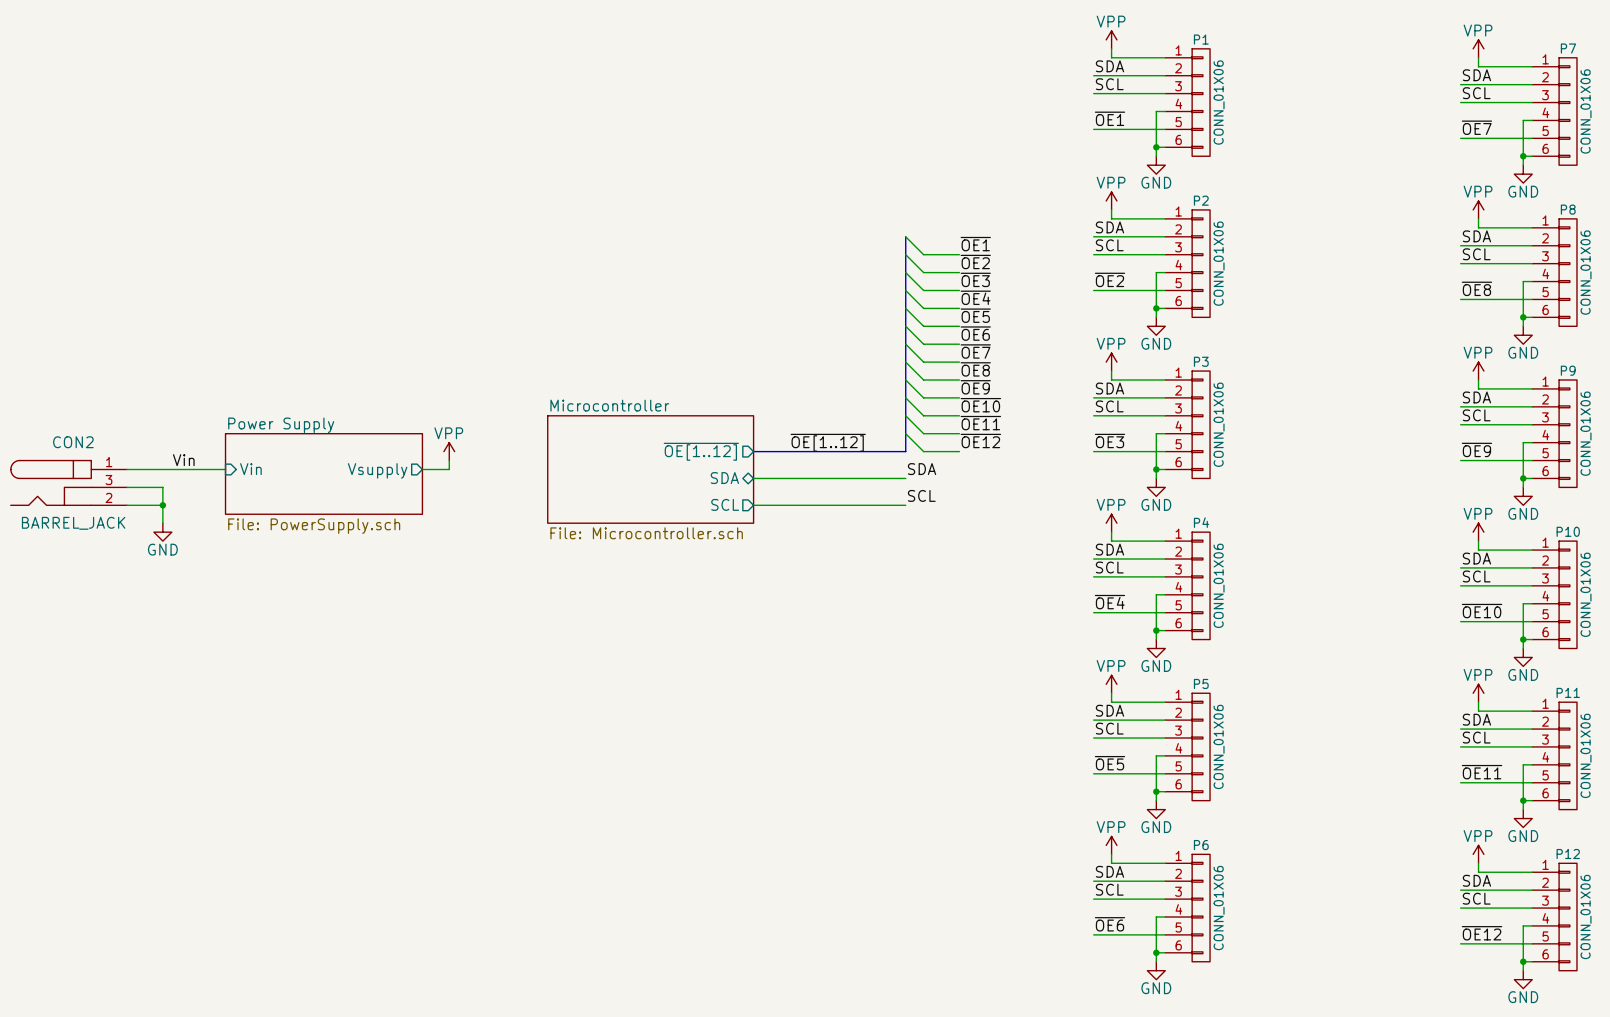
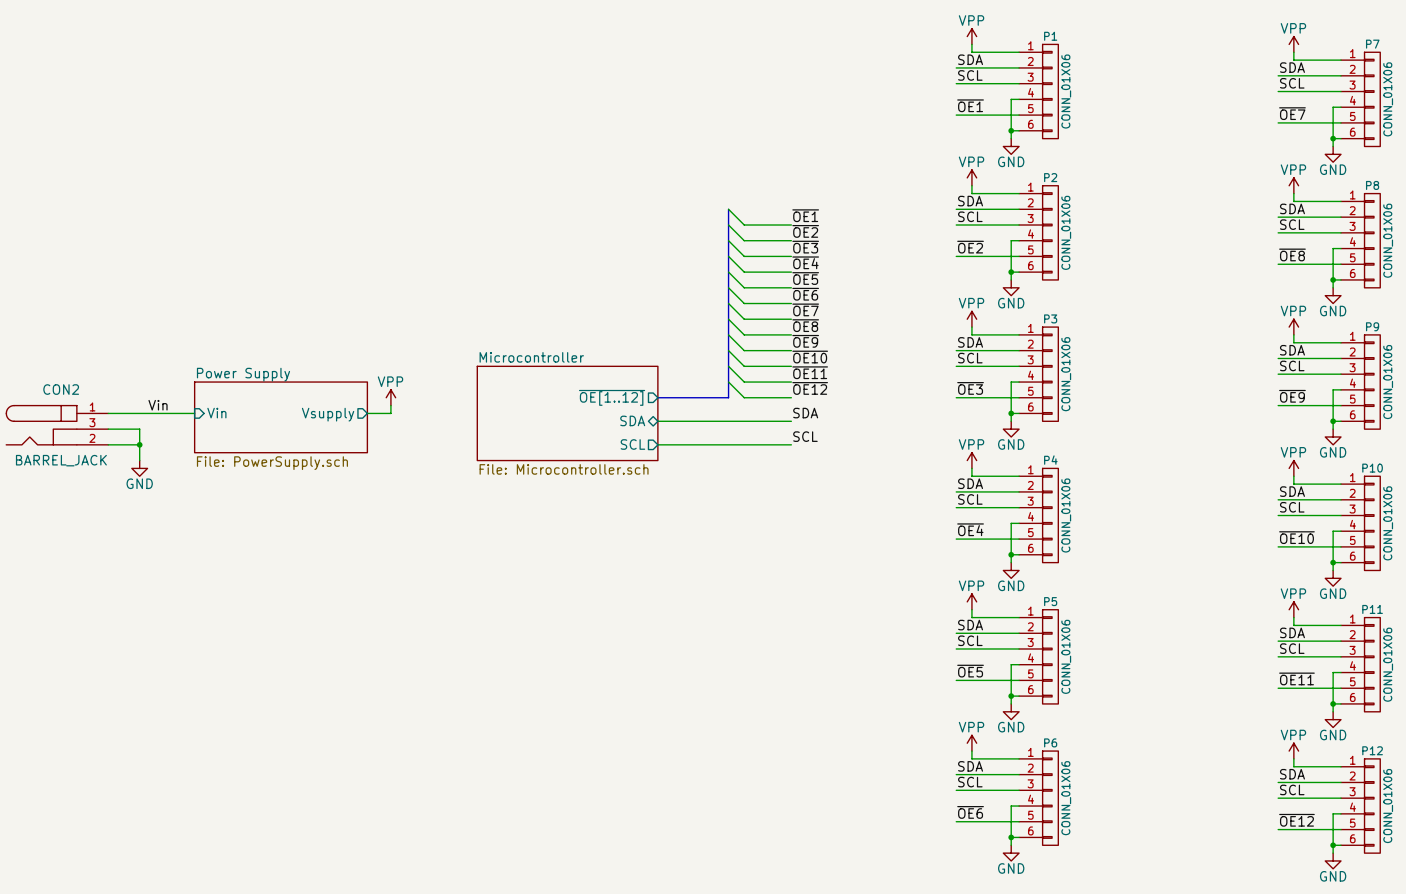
wire: (905, 236) (923, 254) (959, 254) -> none
bus: (905, 236) (905, 451) (834, 451) -> (728, 209) (728, 397)
label position: ~{OE1} (975, 244) -> ~{OE1} (805, 215)
wire: (905, 254) (923, 272) (959, 272) -> (791, 225) (744, 225) (728, 209)
label position: ~{OE2} (975, 261) -> ~{OE2} (805, 231)
wire: (905, 272) (923, 290) (959, 290) -> (791, 240) (744, 240) (728, 225)
label position: ~{OE3} (975, 279) -> ~{OE3} (805, 247)
wire: (905, 290) (923, 308) (959, 308) -> (791, 256) (744, 256) (728, 240)
label position: ~{OE4} (975, 297) -> ~{OE4} (805, 262)
wire: (905, 308) (923, 326) (959, 326) -> (791, 272) (744, 272) (728, 256)
label position: ~{OE5} (975, 315) -> ~{OE5} (805, 278)
wire: (905, 326) (923, 344) (959, 344) -> (791, 287) (744, 287) (728, 272)
label position: ~{OE6} (975, 333) -> ~{OE6} (805, 294)
wire: (905, 344) (923, 362) (959, 362) -> (791, 303) (744, 303) (728, 287)
label position: ~{OE7} (975, 351) -> ~{OE7} (805, 309)
wire: (905, 362) (923, 380) (959, 380) -> (791, 319) (744, 319) (728, 303)
label position: ~{OE8} (975, 369) -> ~{OE8} (805, 325)
wire: (905, 380) (923, 397) (959, 397) -> (791, 334) (744, 334) (728, 319)
label position: ~{OE9} (975, 387) -> ~{OE9} (805, 341)
wire: (905, 397) (923, 415) (959, 415) -> (791, 350) (744, 350) (728, 334)
label position: ~{OE10} (980, 405) -> ~{OE10} (810, 357)
wire: (905, 415) (923, 433) (959, 433) -> (791, 366) (744, 366) (728, 350)
label position: ~{OE11} (980, 423) -> ~{OE11} (810, 372)
wire: (905, 433) (923, 451) (959, 451) -> (791, 382) (744, 382) (728, 366)
label position: ~{OE12} (980, 440) -> ~{OE12} (810, 388)
label: ~{OE[1..12]} (828, 442) -> none

